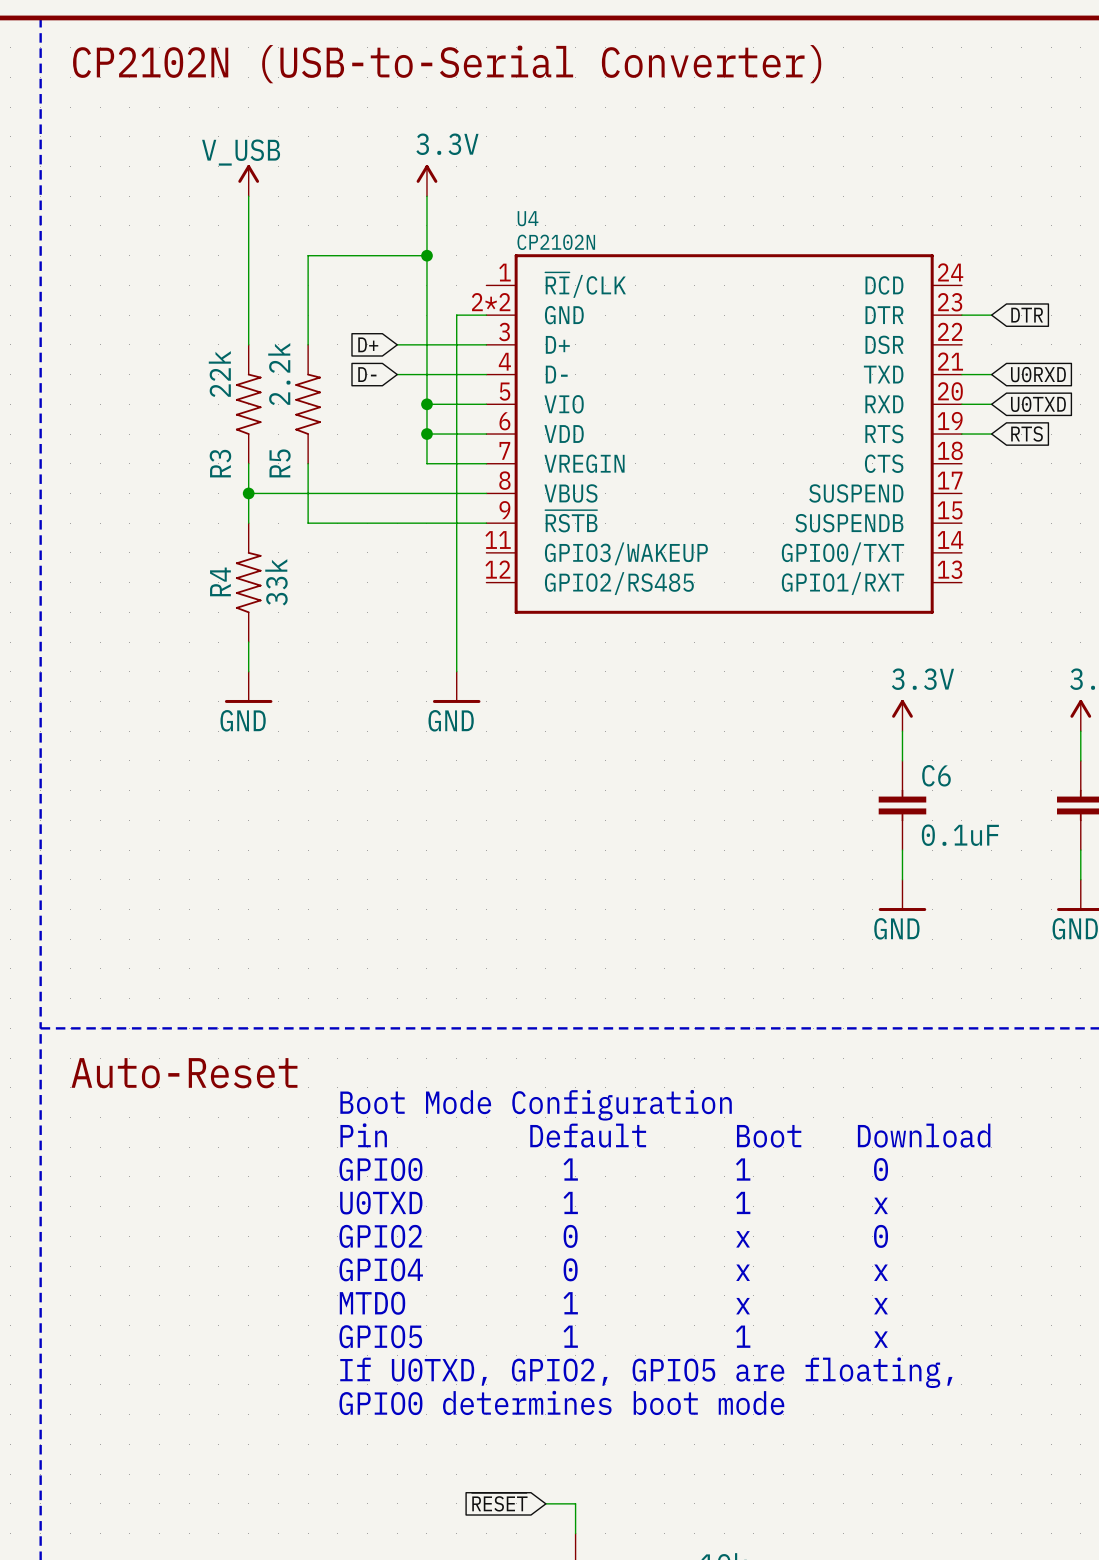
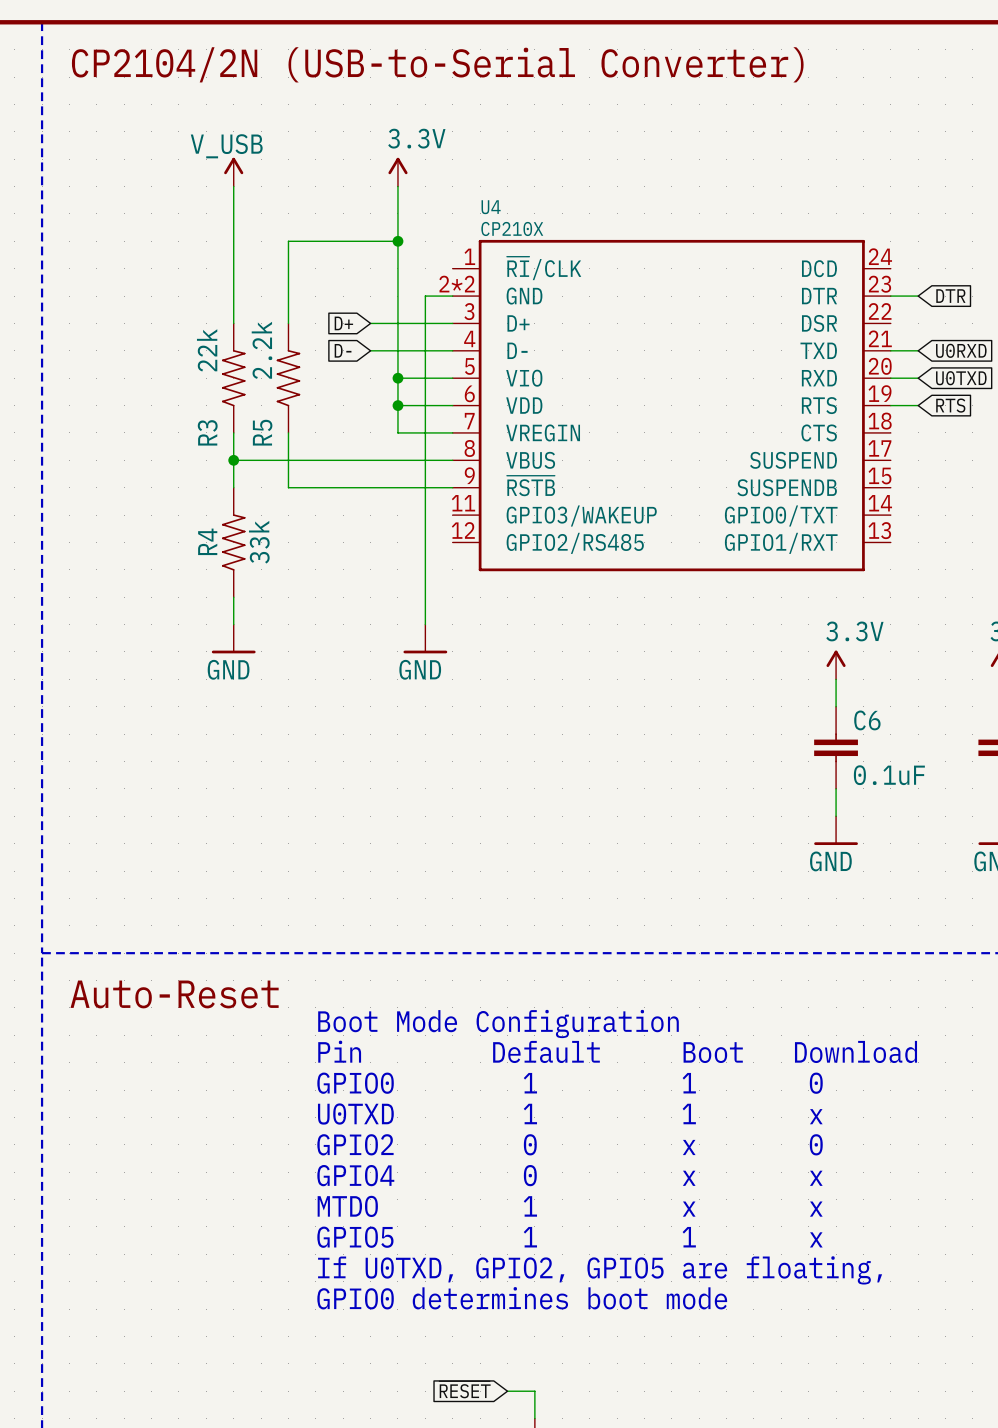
text: CP2102N (USB-to-Serial Converter) (447, 64) -> CP2104/2N (USB-to-Serial Converter) (437, 64)
U4 value: CP2102N (556, 242) -> CP210X (512, 228)

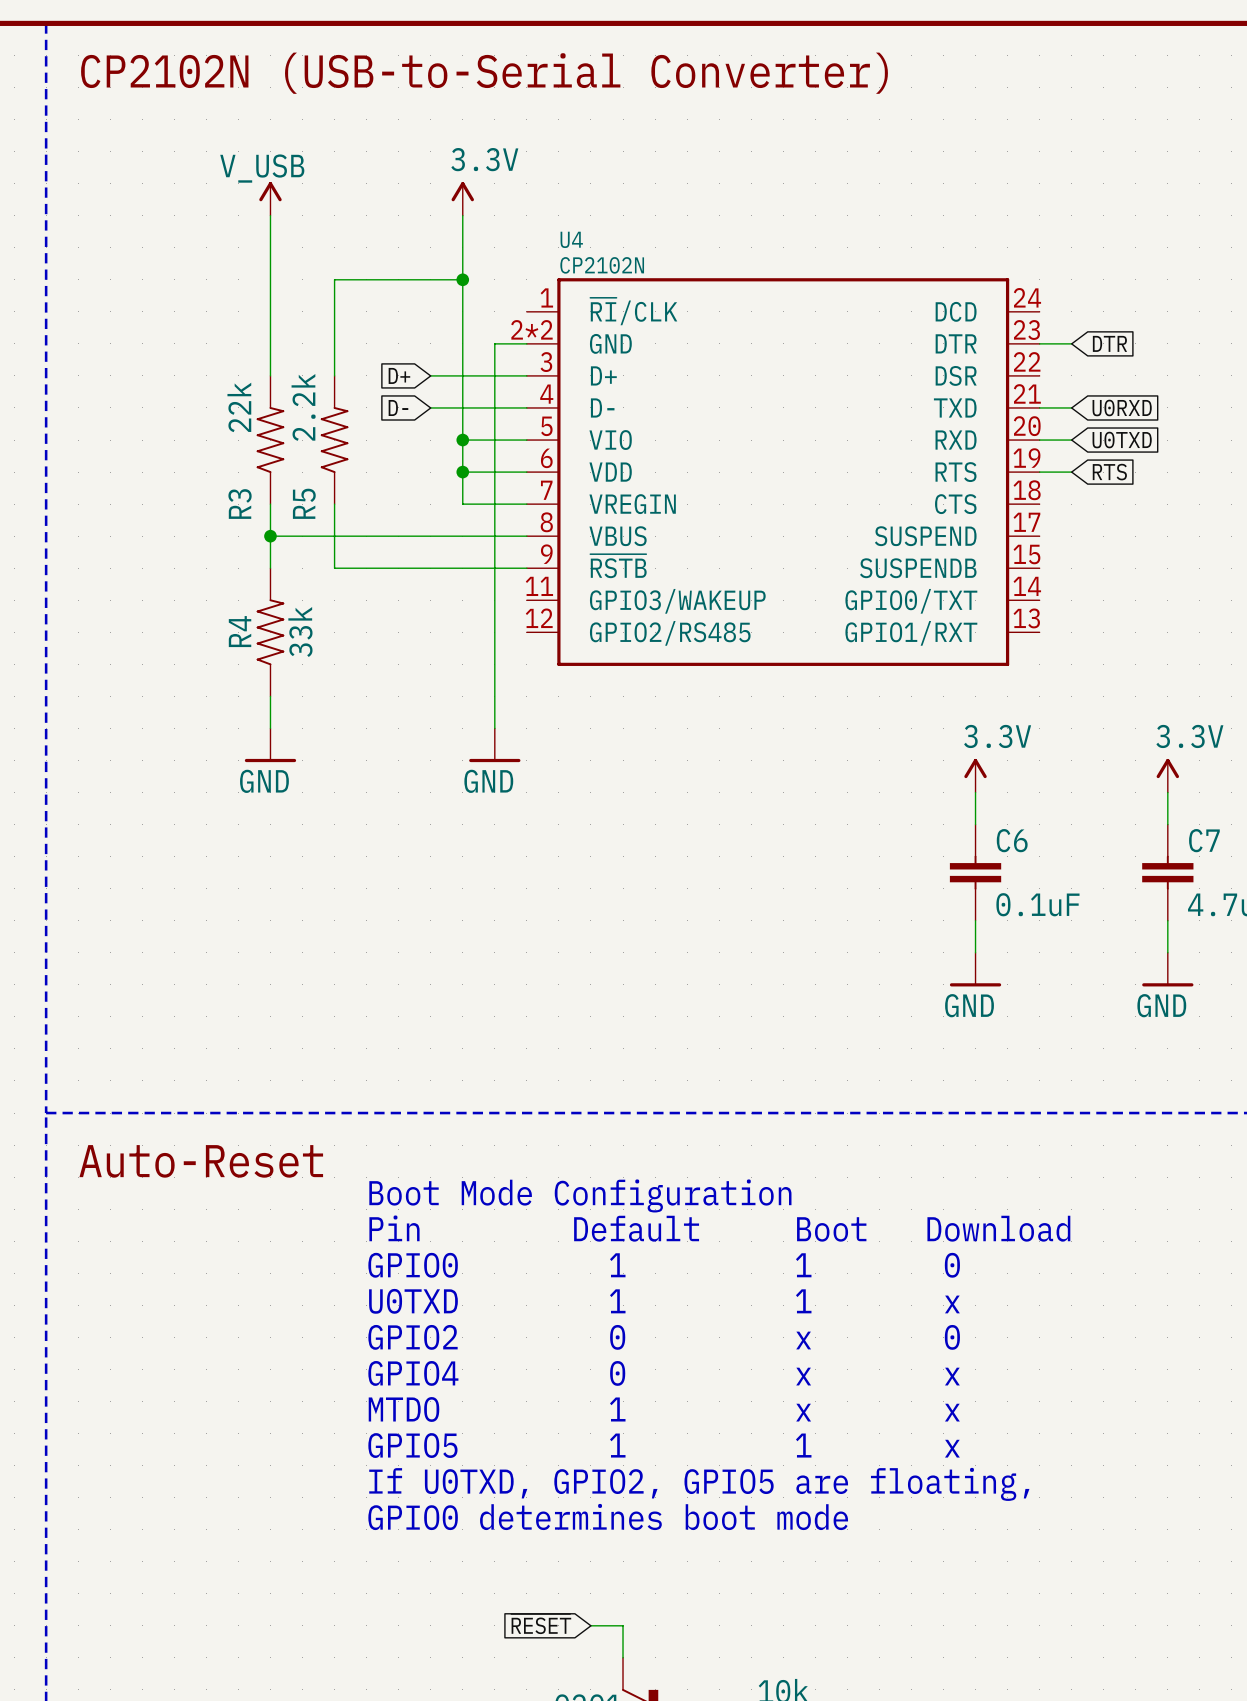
text: CP2104/2N (USB-to-Serial Converter) (437, 64) -> CP2102N (USB-to-Serial Converter) (484, 73)
U4 value: CP210X (512, 228) -> CP2102N (602, 265)

